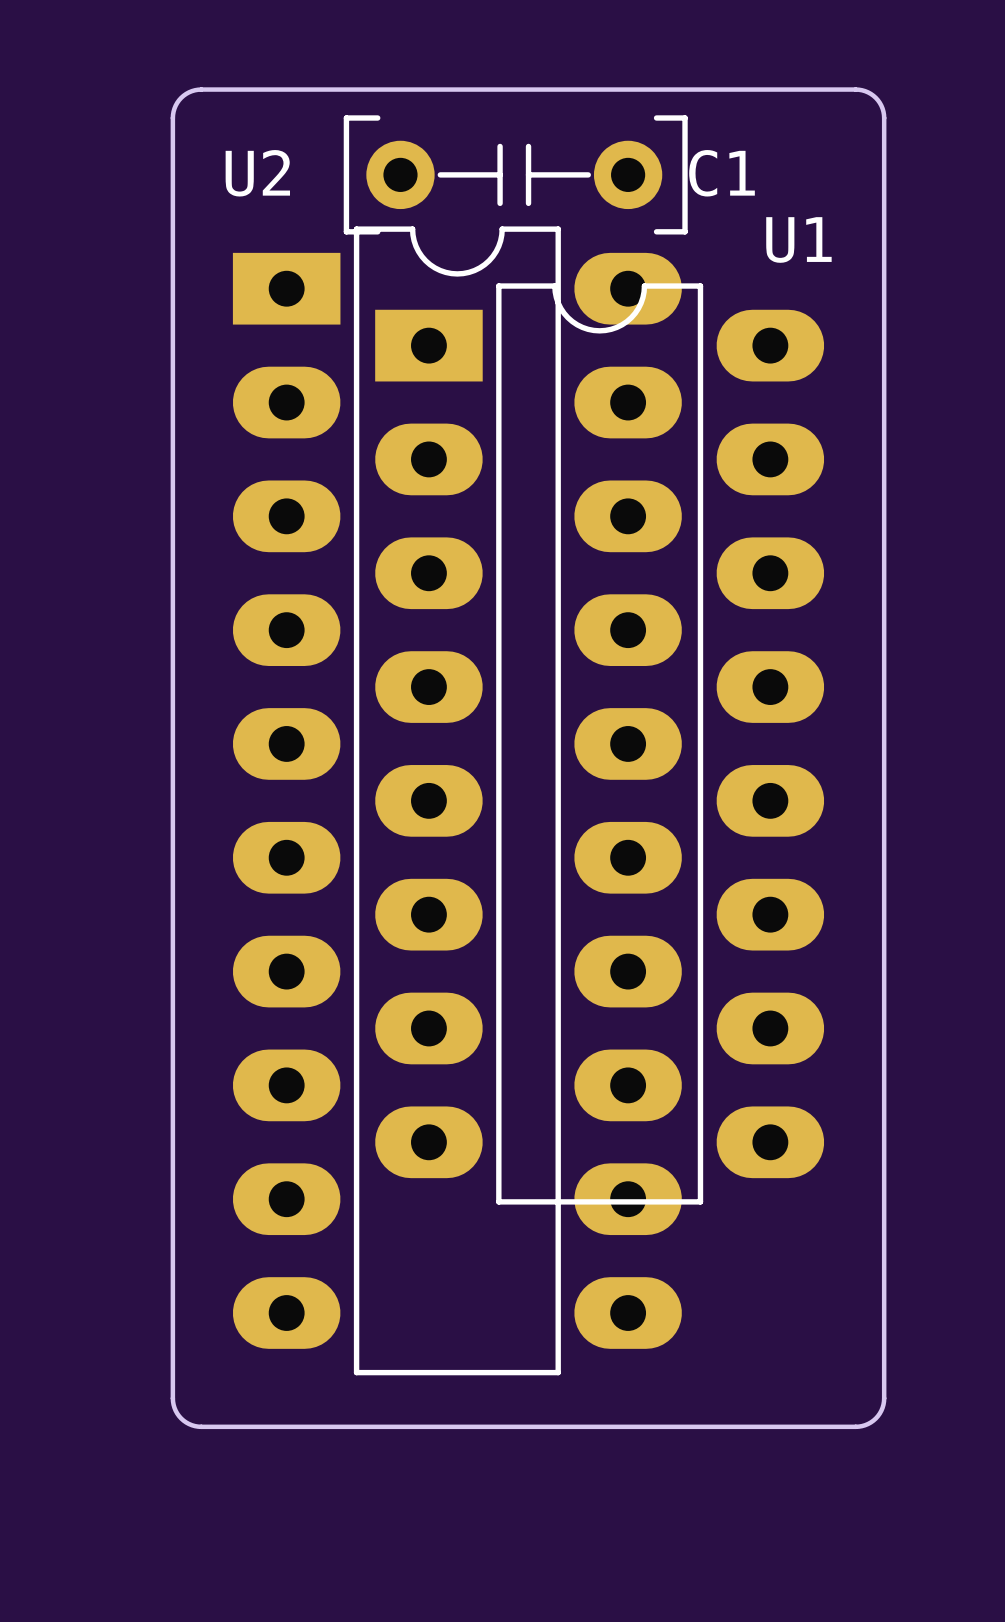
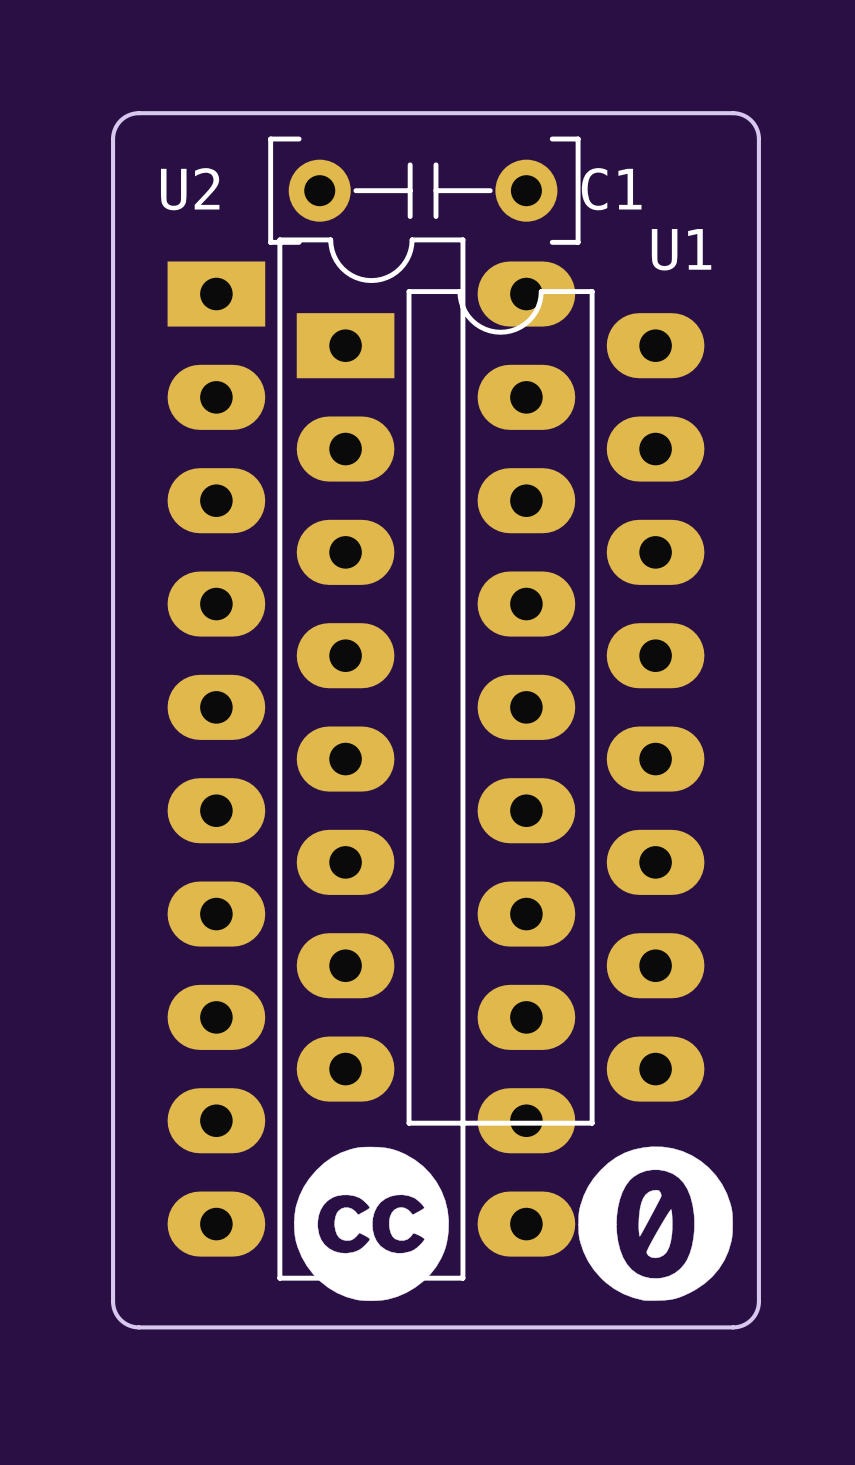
drawing: none -> [294, 1146, 449, 1301]
drawing: none -> [578, 1146, 733, 1301]

